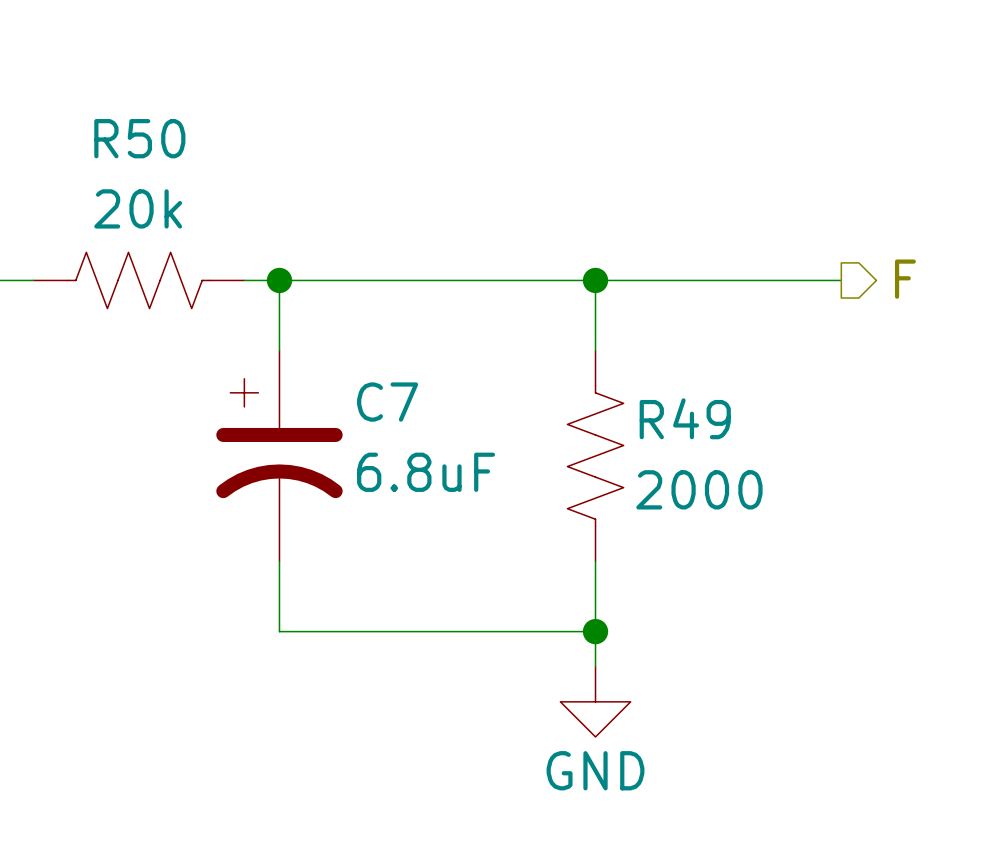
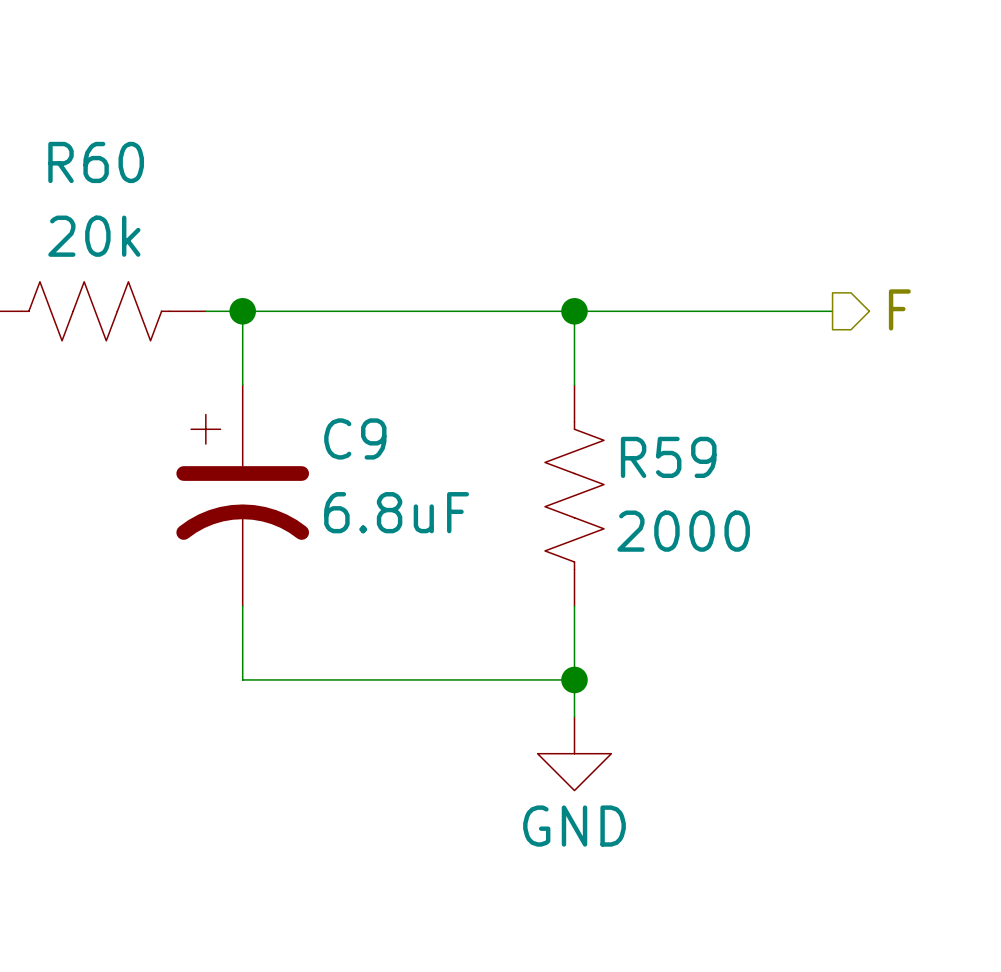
R50 name: R50 (139, 138) -> R60 (96, 162)
C7 name: C7 (387, 402) -> C9 (355, 438)
R49 name: R49 (685, 418) -> R59 (668, 457)

